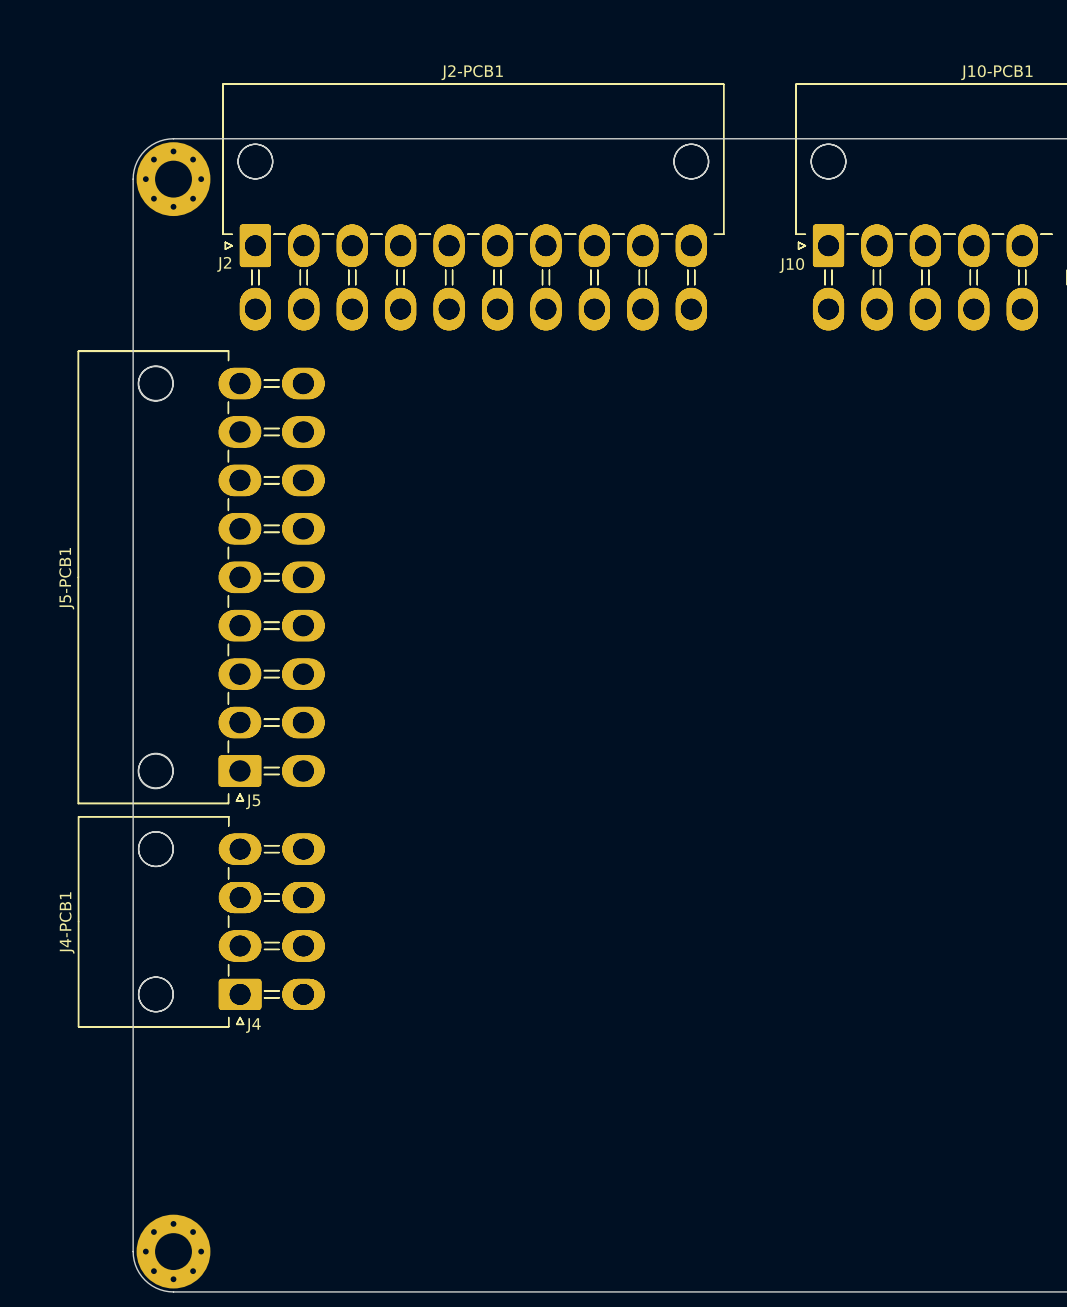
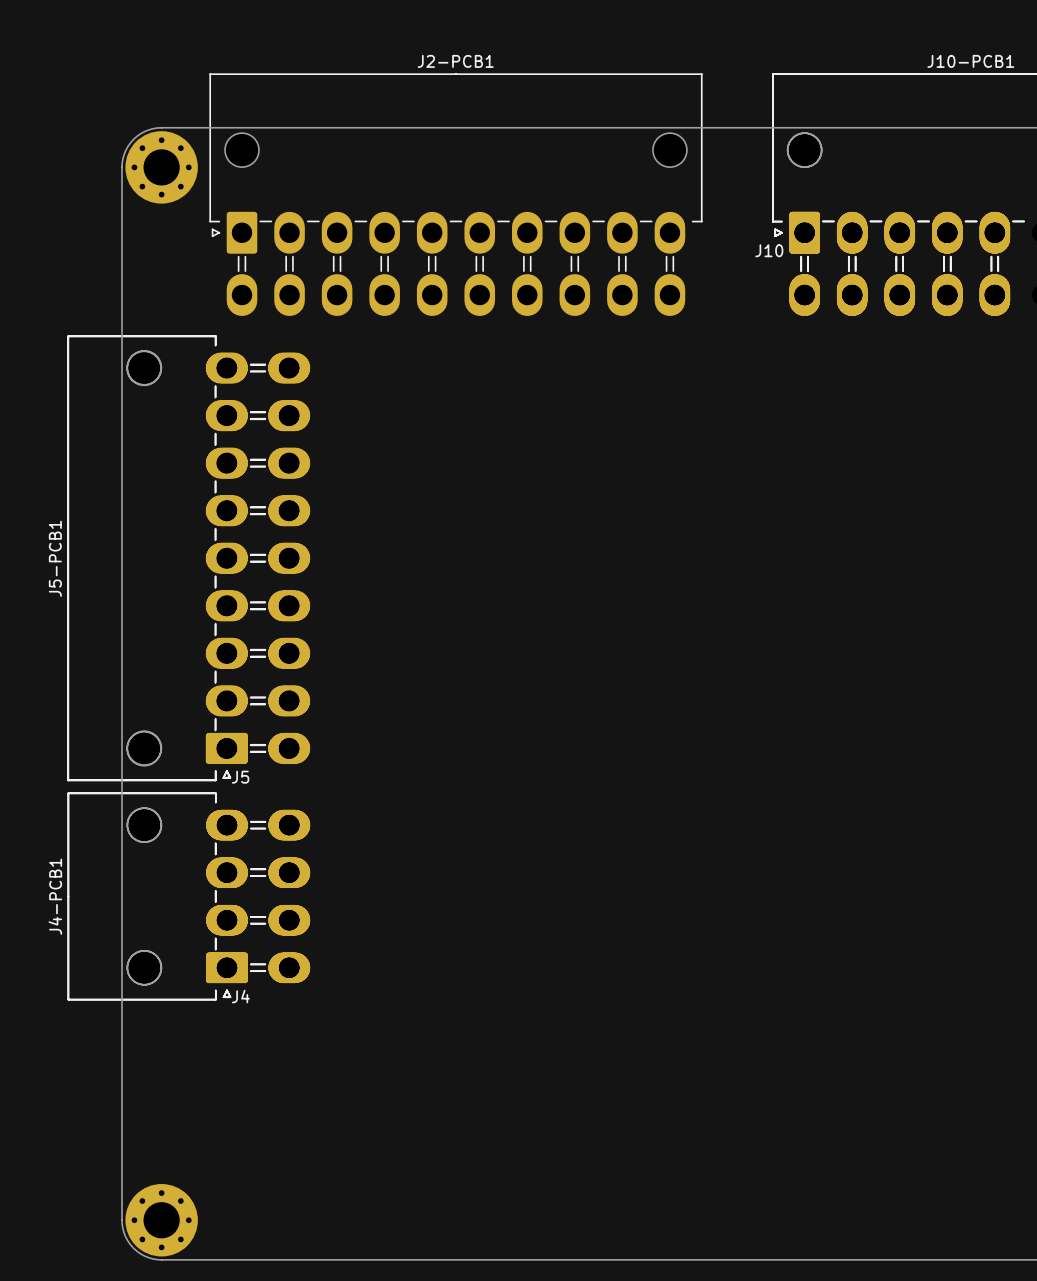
J2: (473, 206) -> none

